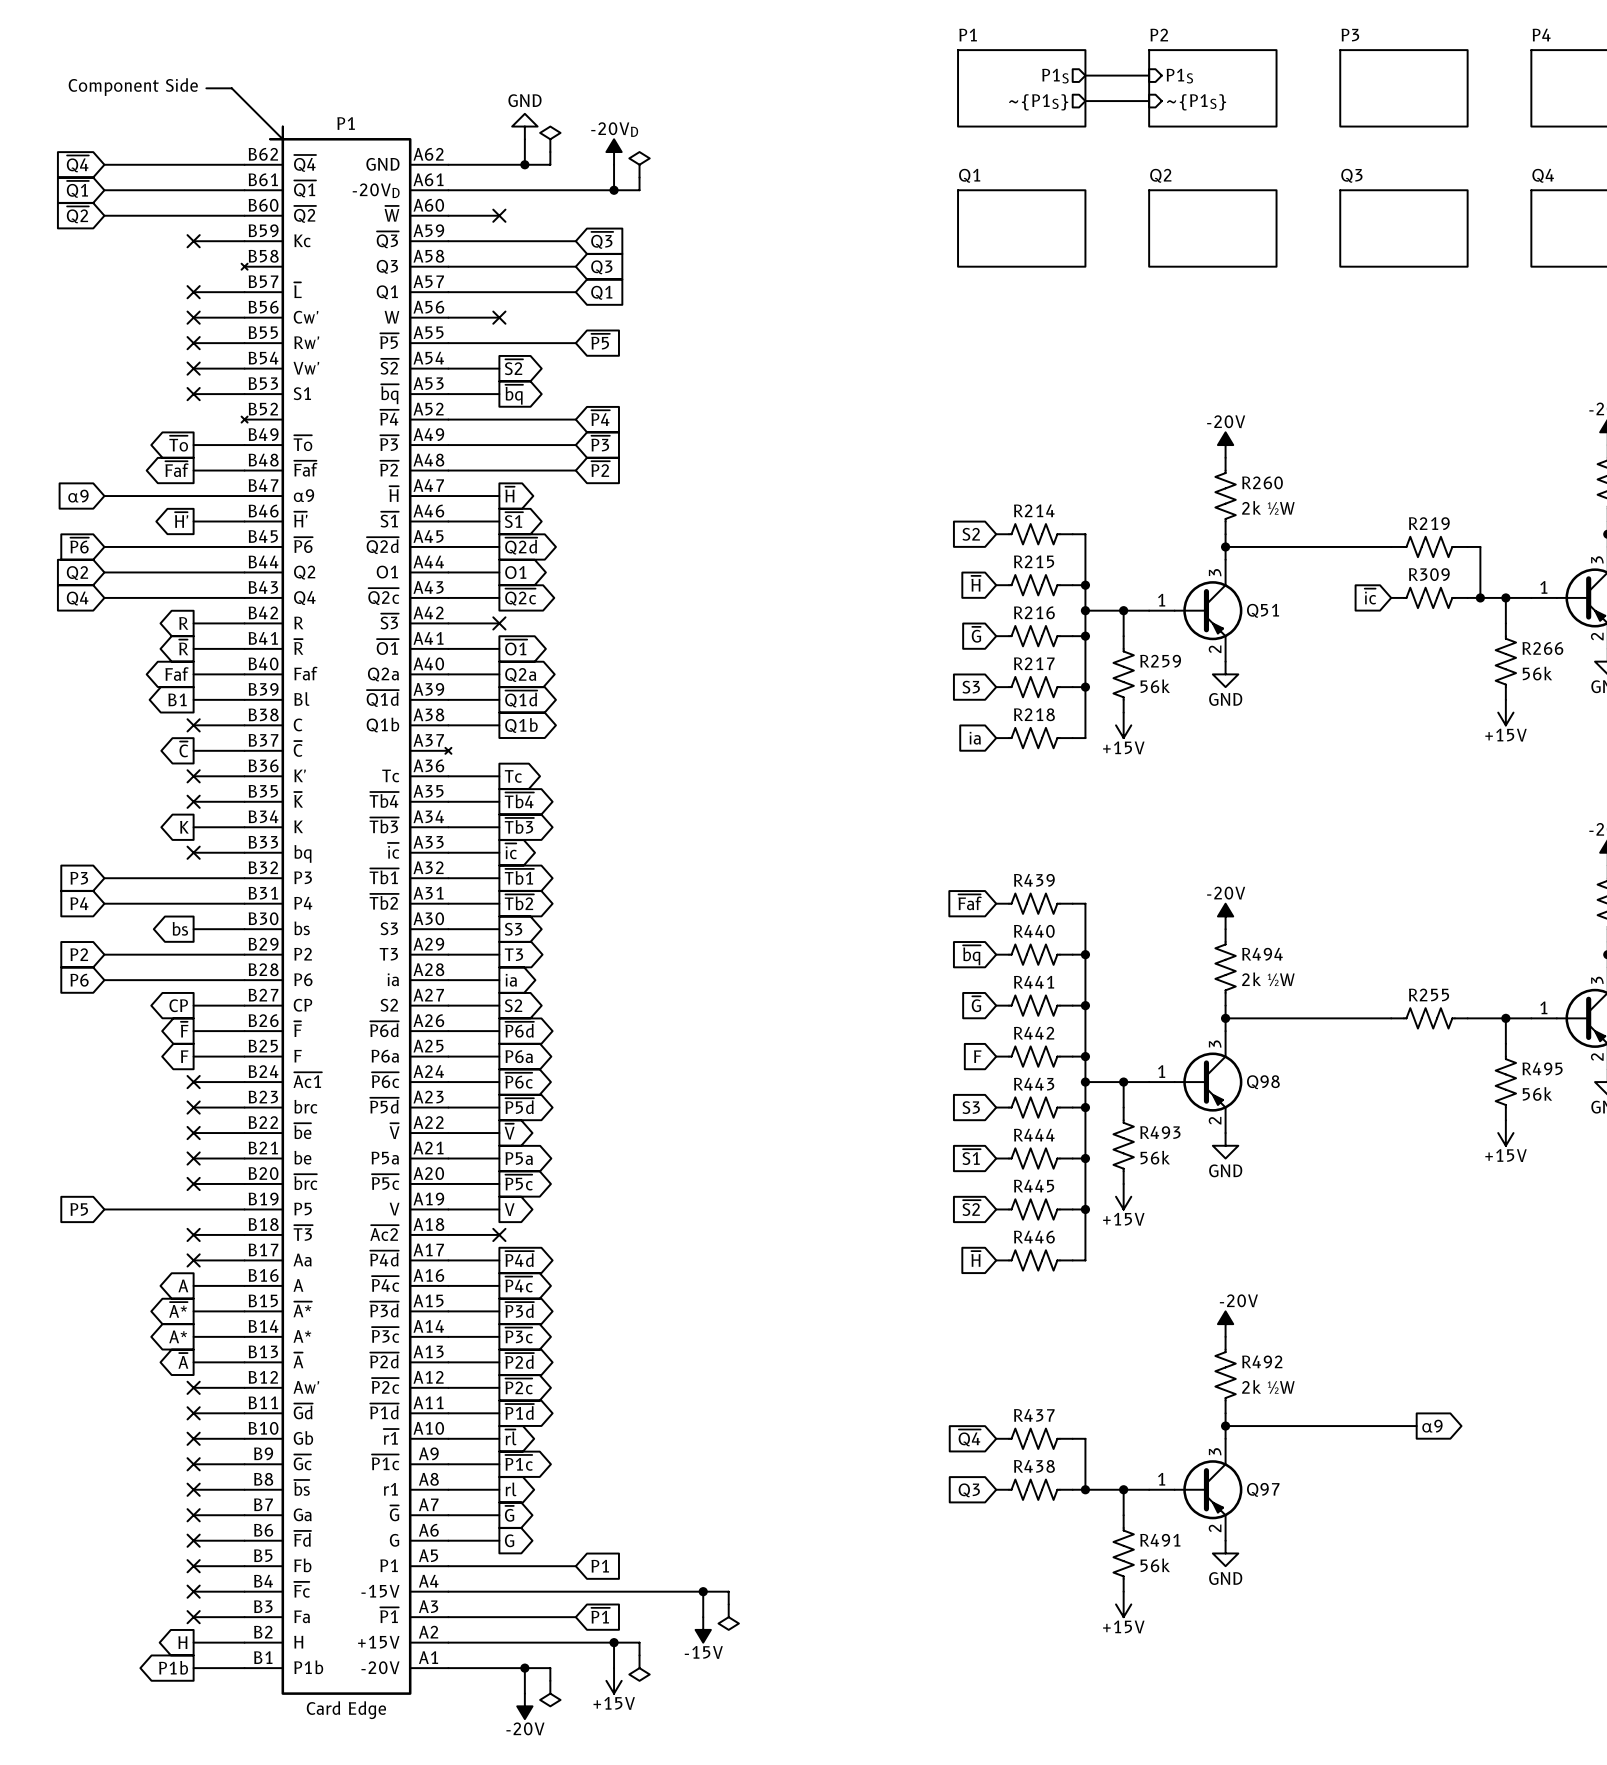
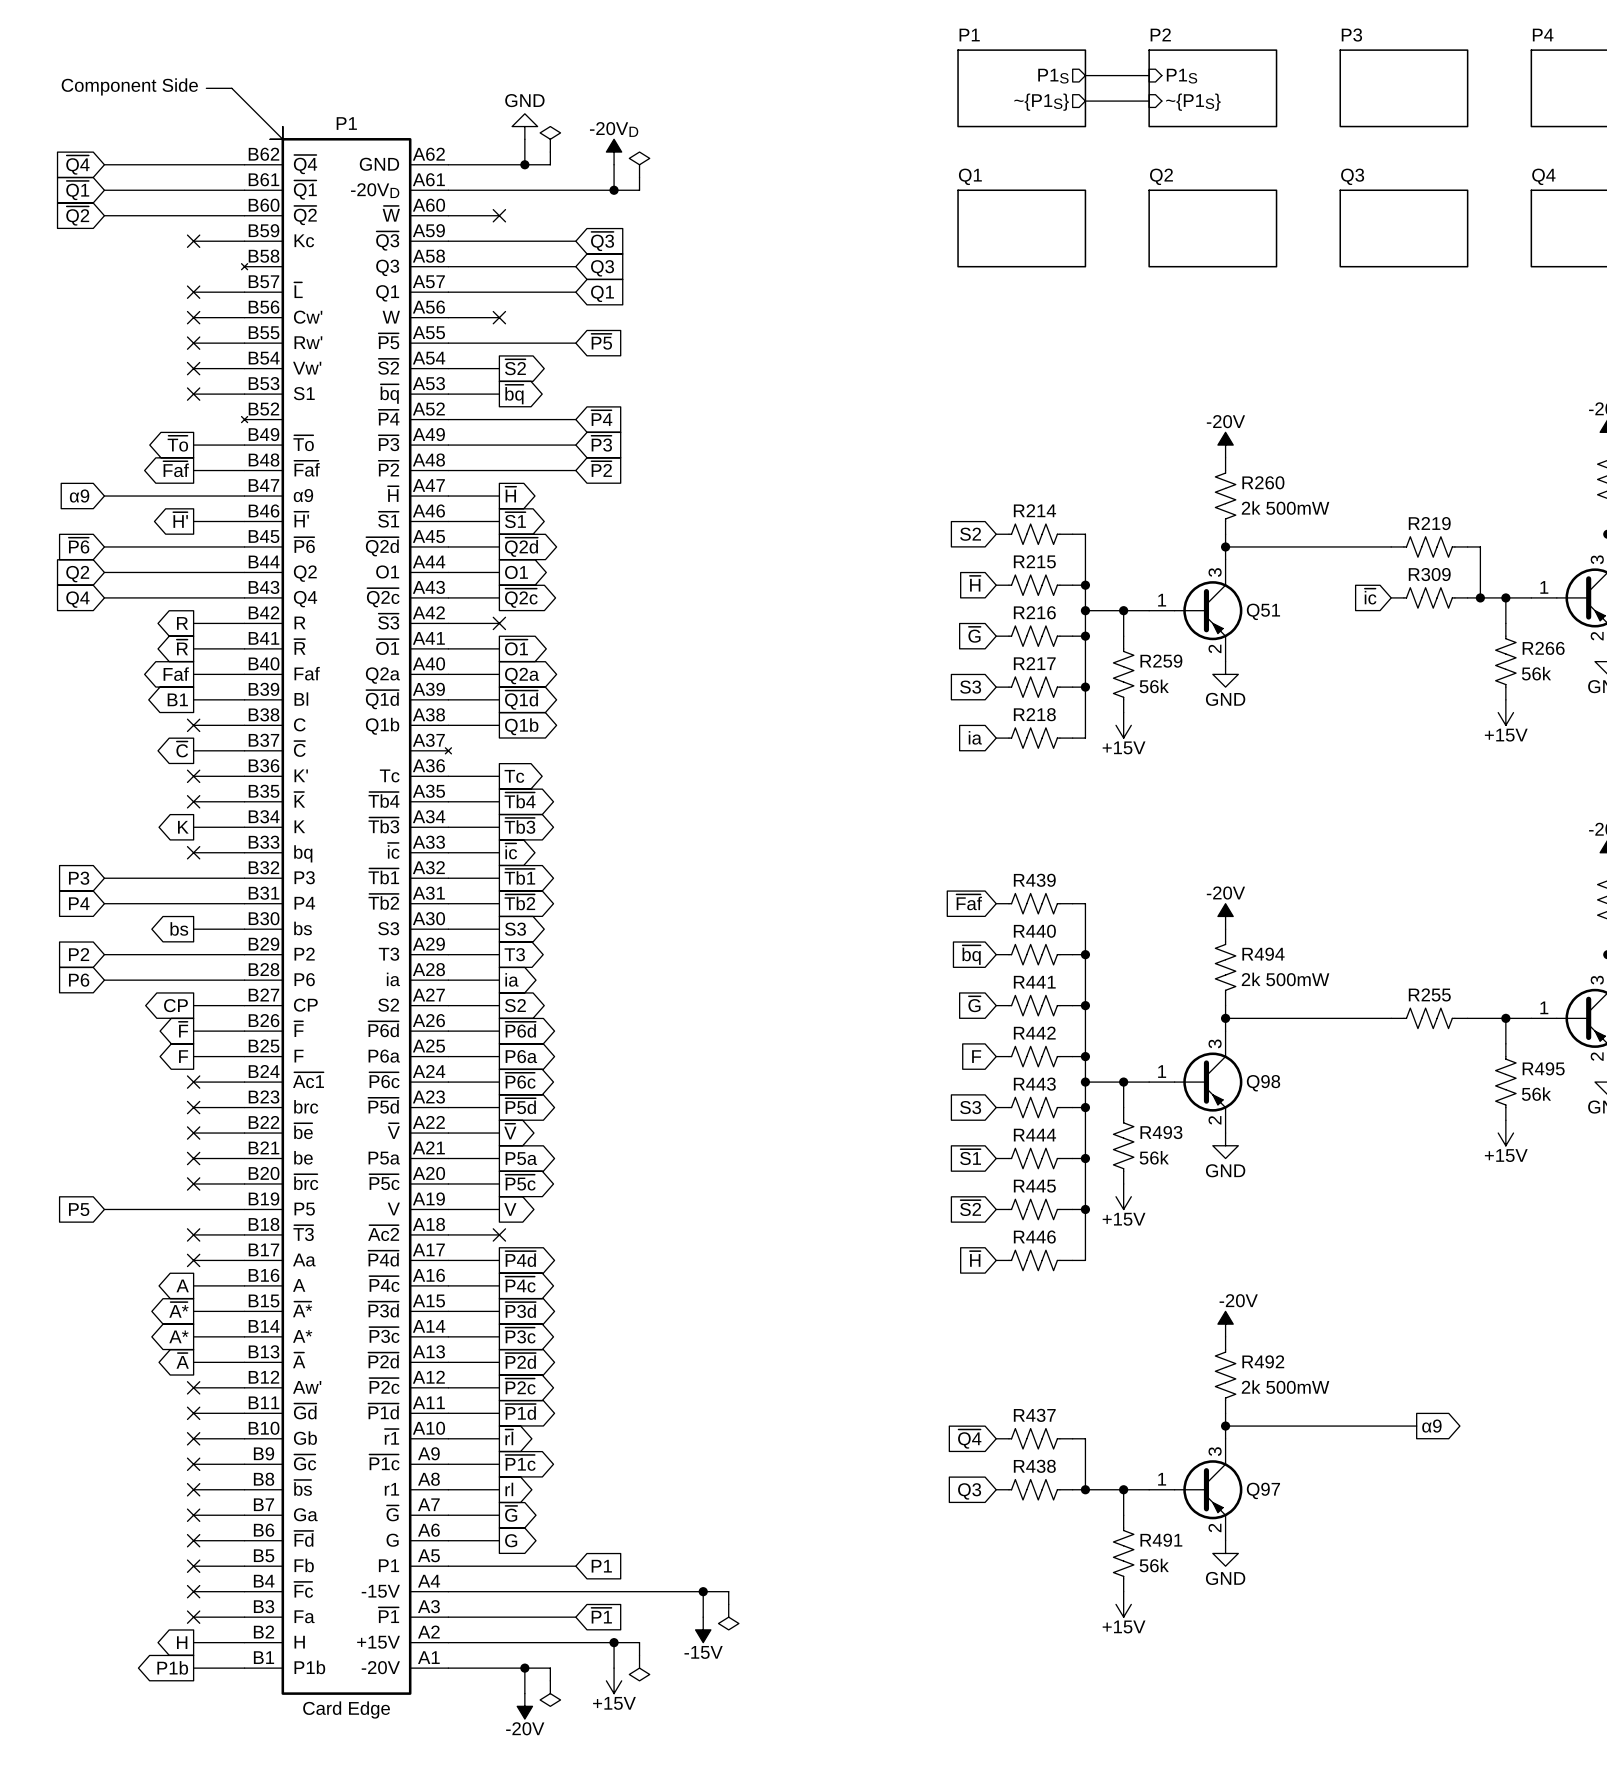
R260 value: 2k ½W (1268, 507) -> 2k 500mW (1285, 508)
R494 value: 2k ½W (1268, 979) -> 2k 500mW (1285, 979)
R492 value: 2k ½W (1268, 1386) -> 2k 500mW (1285, 1387)

